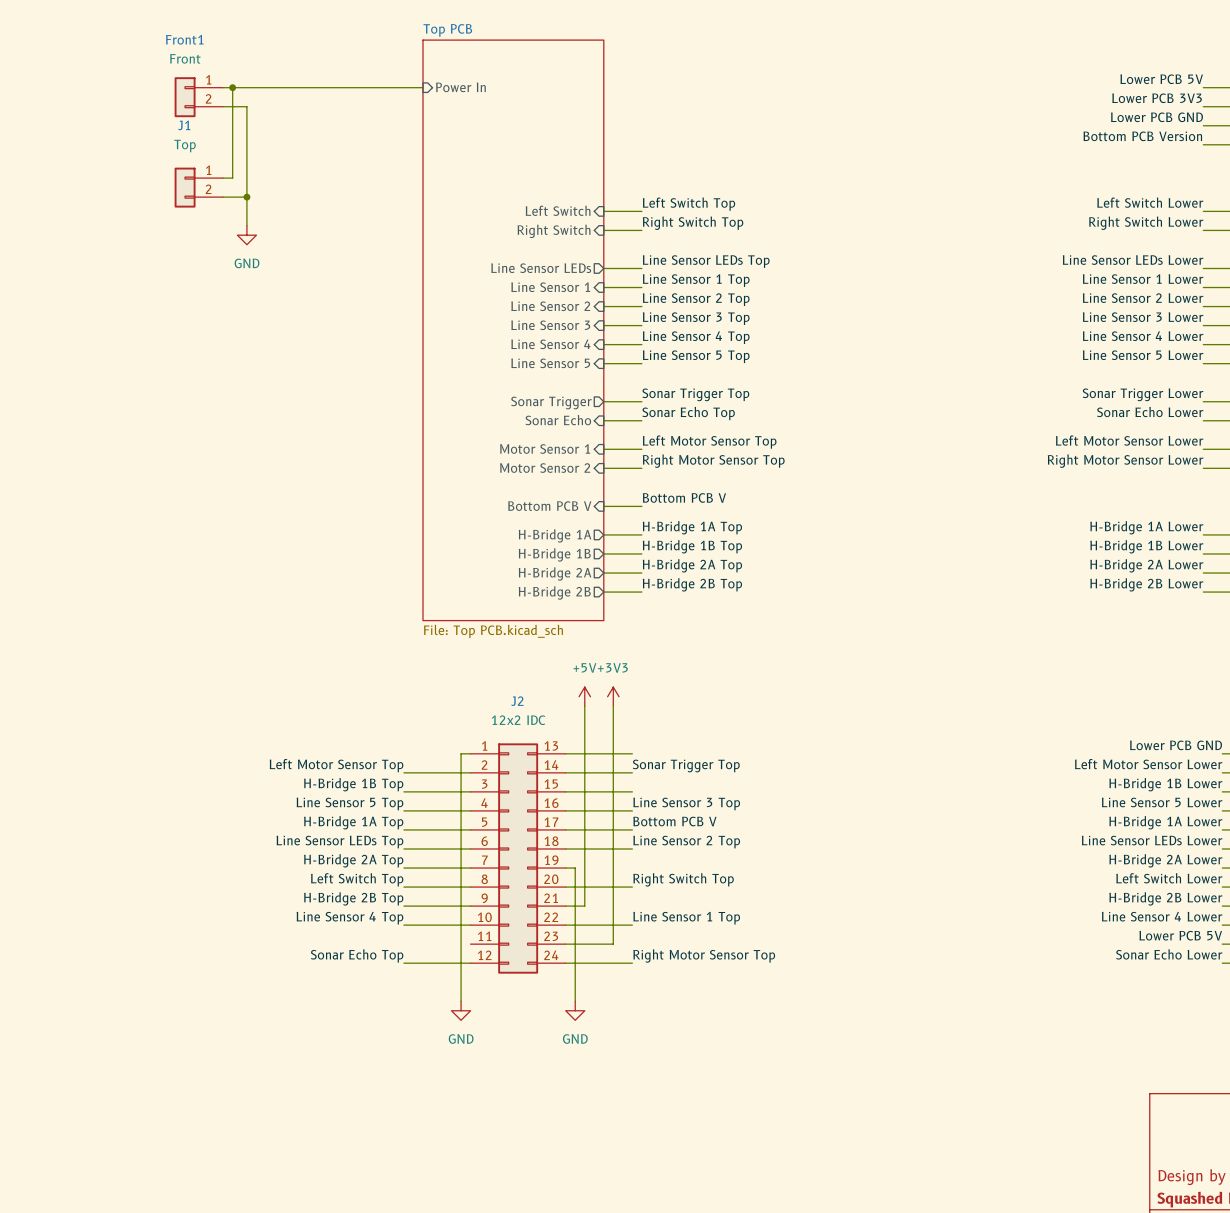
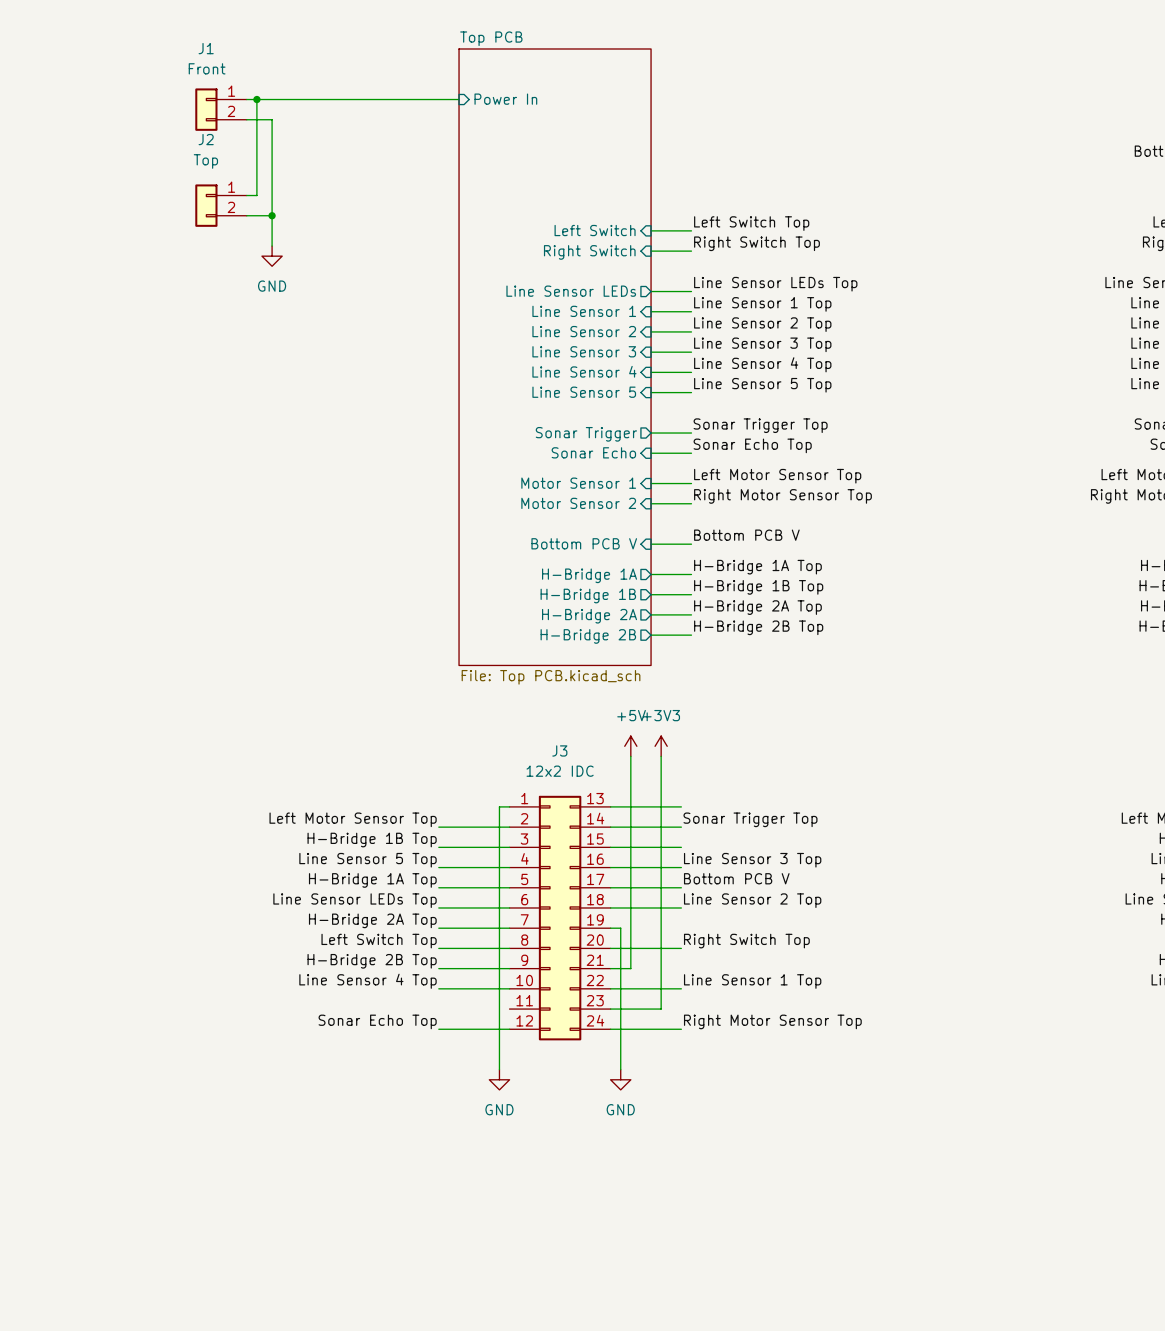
Front1 name: Front1 (184, 39) -> J1 (206, 48)
J1 name: J1 (184, 125) -> J2 (206, 139)
J2 name: J2 (517, 701) -> J3 (559, 750)

